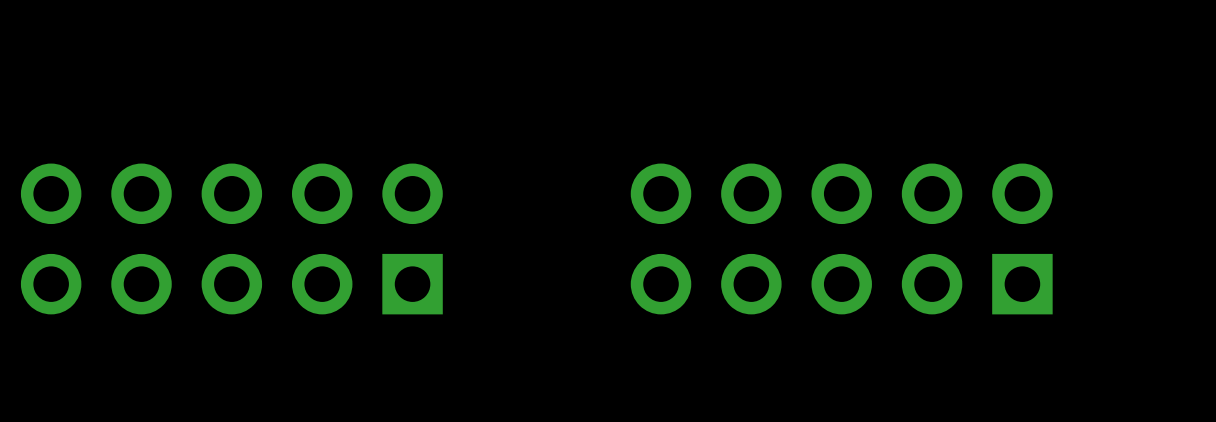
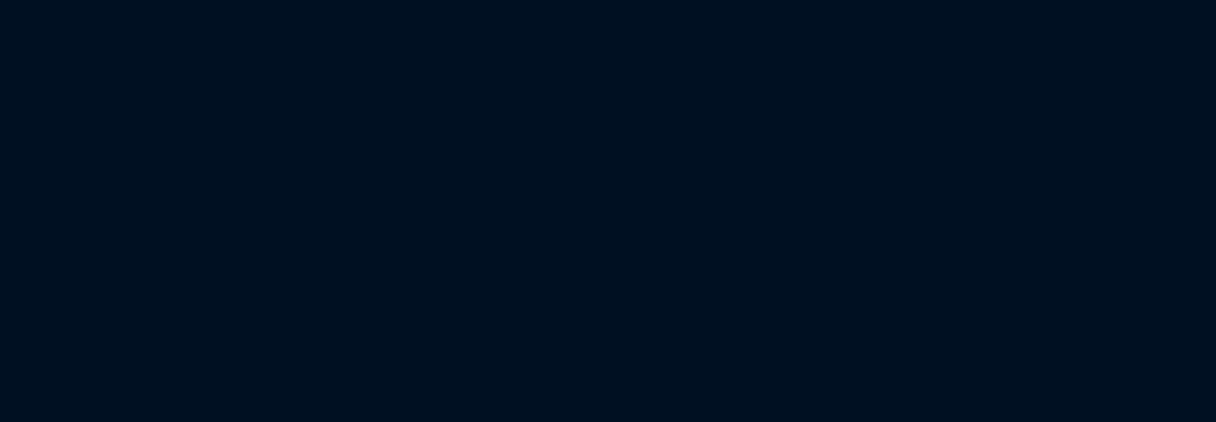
part: (231, 238) -> none
part: (841, 238) -> none

